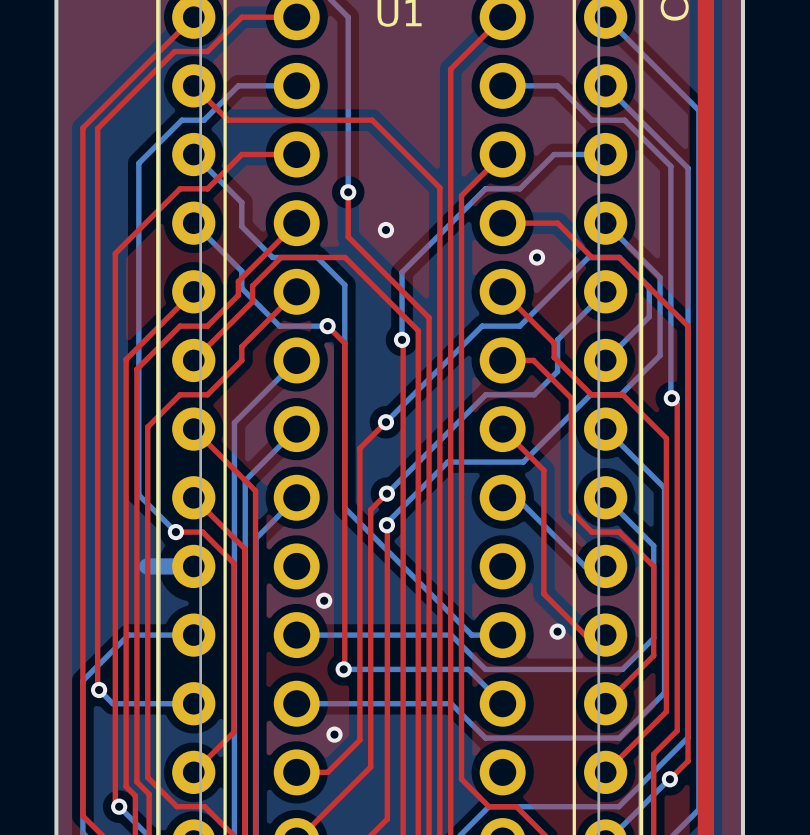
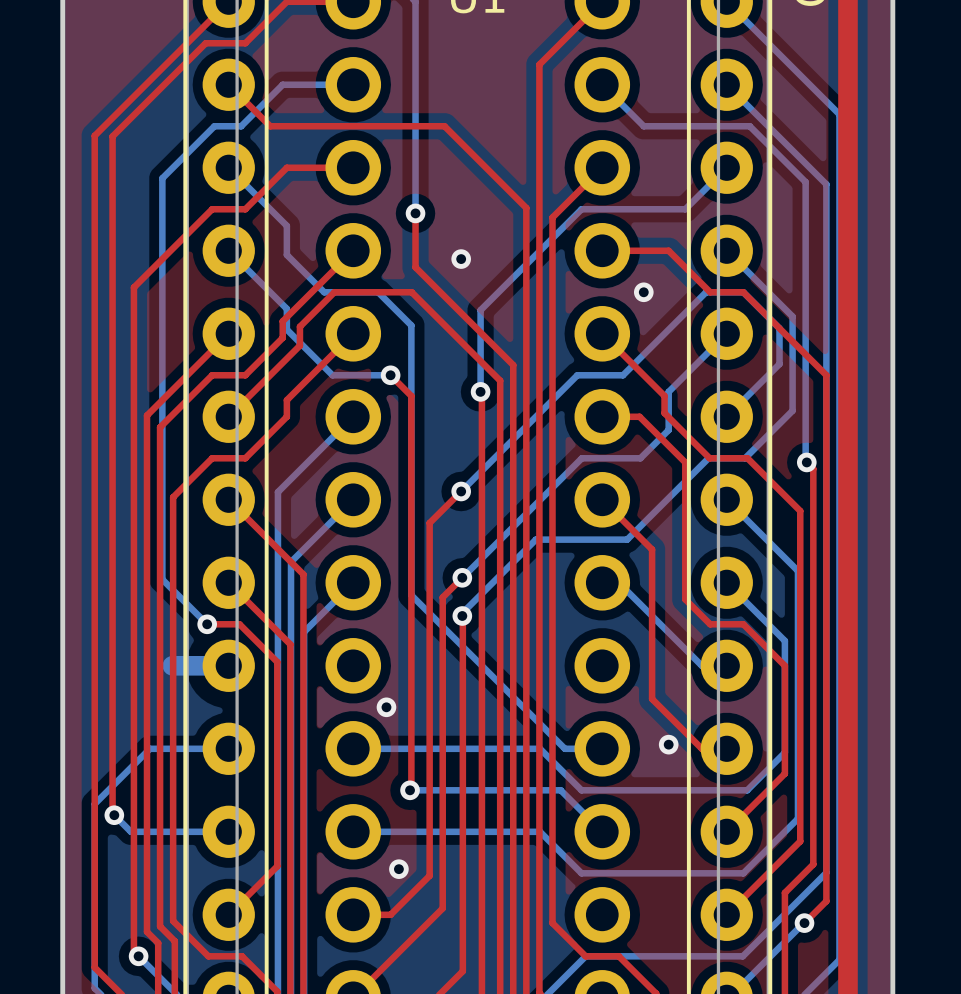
bottom track: (502, 85) (557, 85) (591, 120) -> (602, 84) (643, 126) (710, 126)
bottom track: (605, 154) (554, 154) (519, 188) -> (726, 167) (685, 209) (623, 209)

